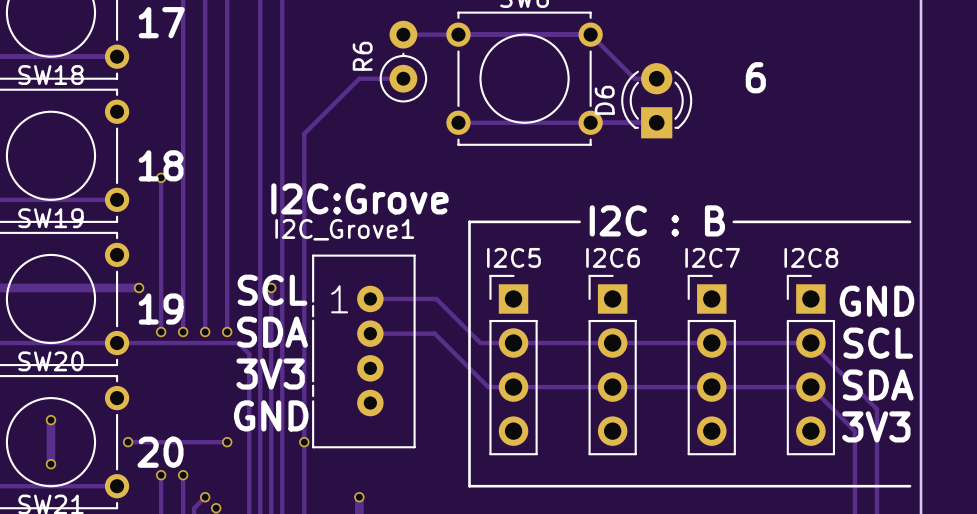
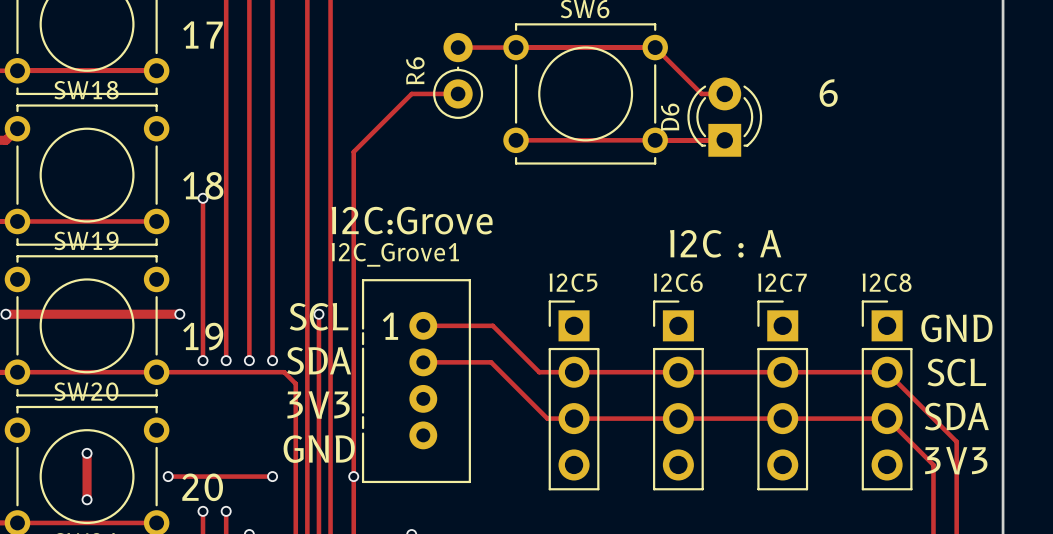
text: I2C : B (657, 220) -> I2C : A (725, 243)
line: (579, 221) (469, 221) (469, 486) (910, 486) -> none
line: (733, 221) (910, 221) -> none

